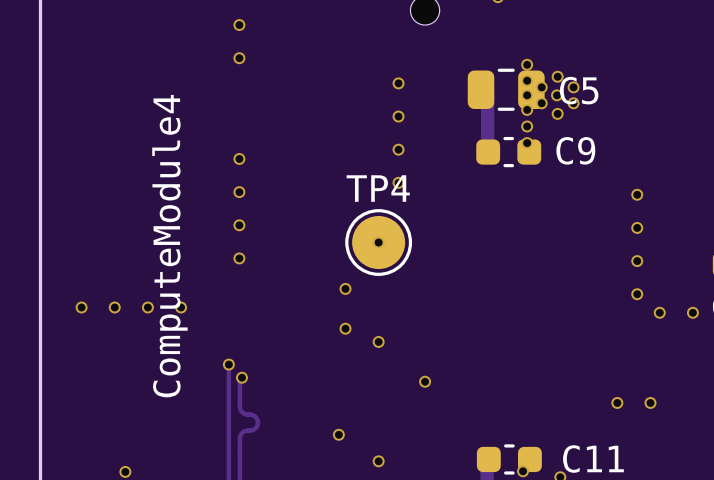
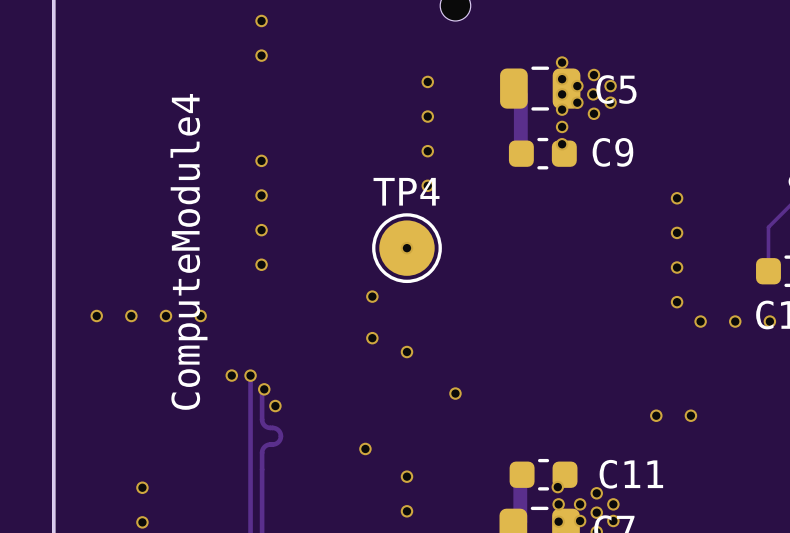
via: none -> (231, 375)
via: none -> (275, 406)

